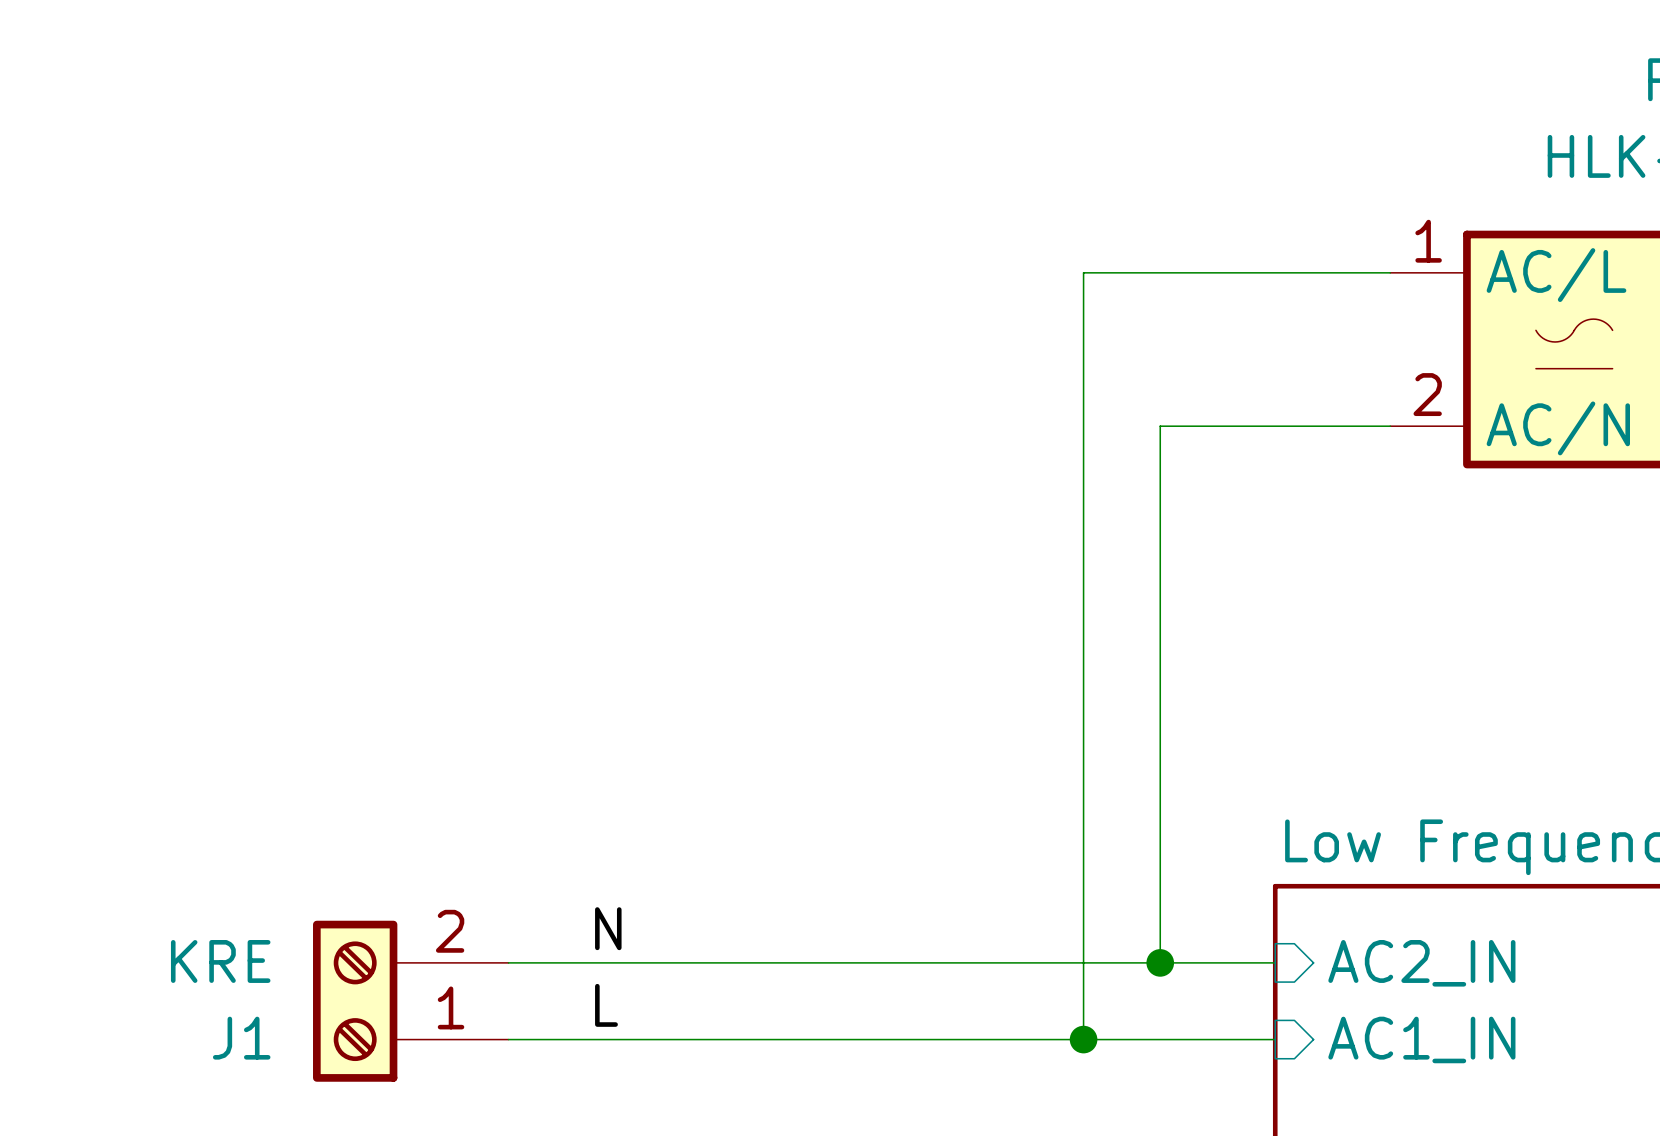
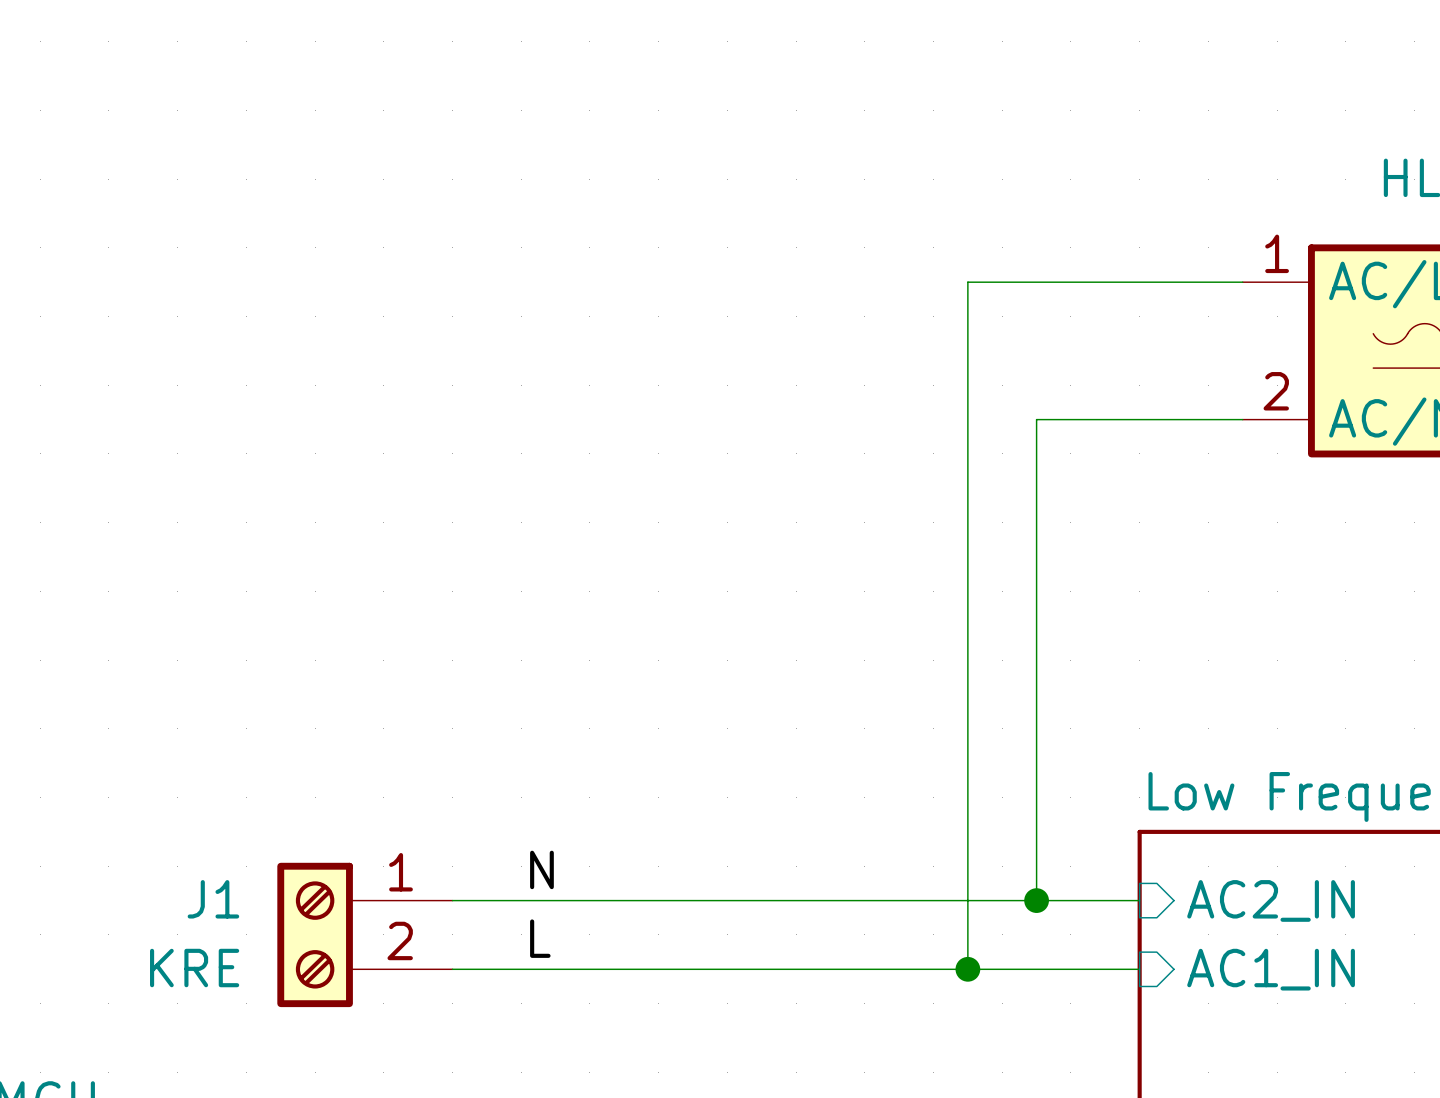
J1 flip: as is (355, 1001) -> up-down (315, 934)

